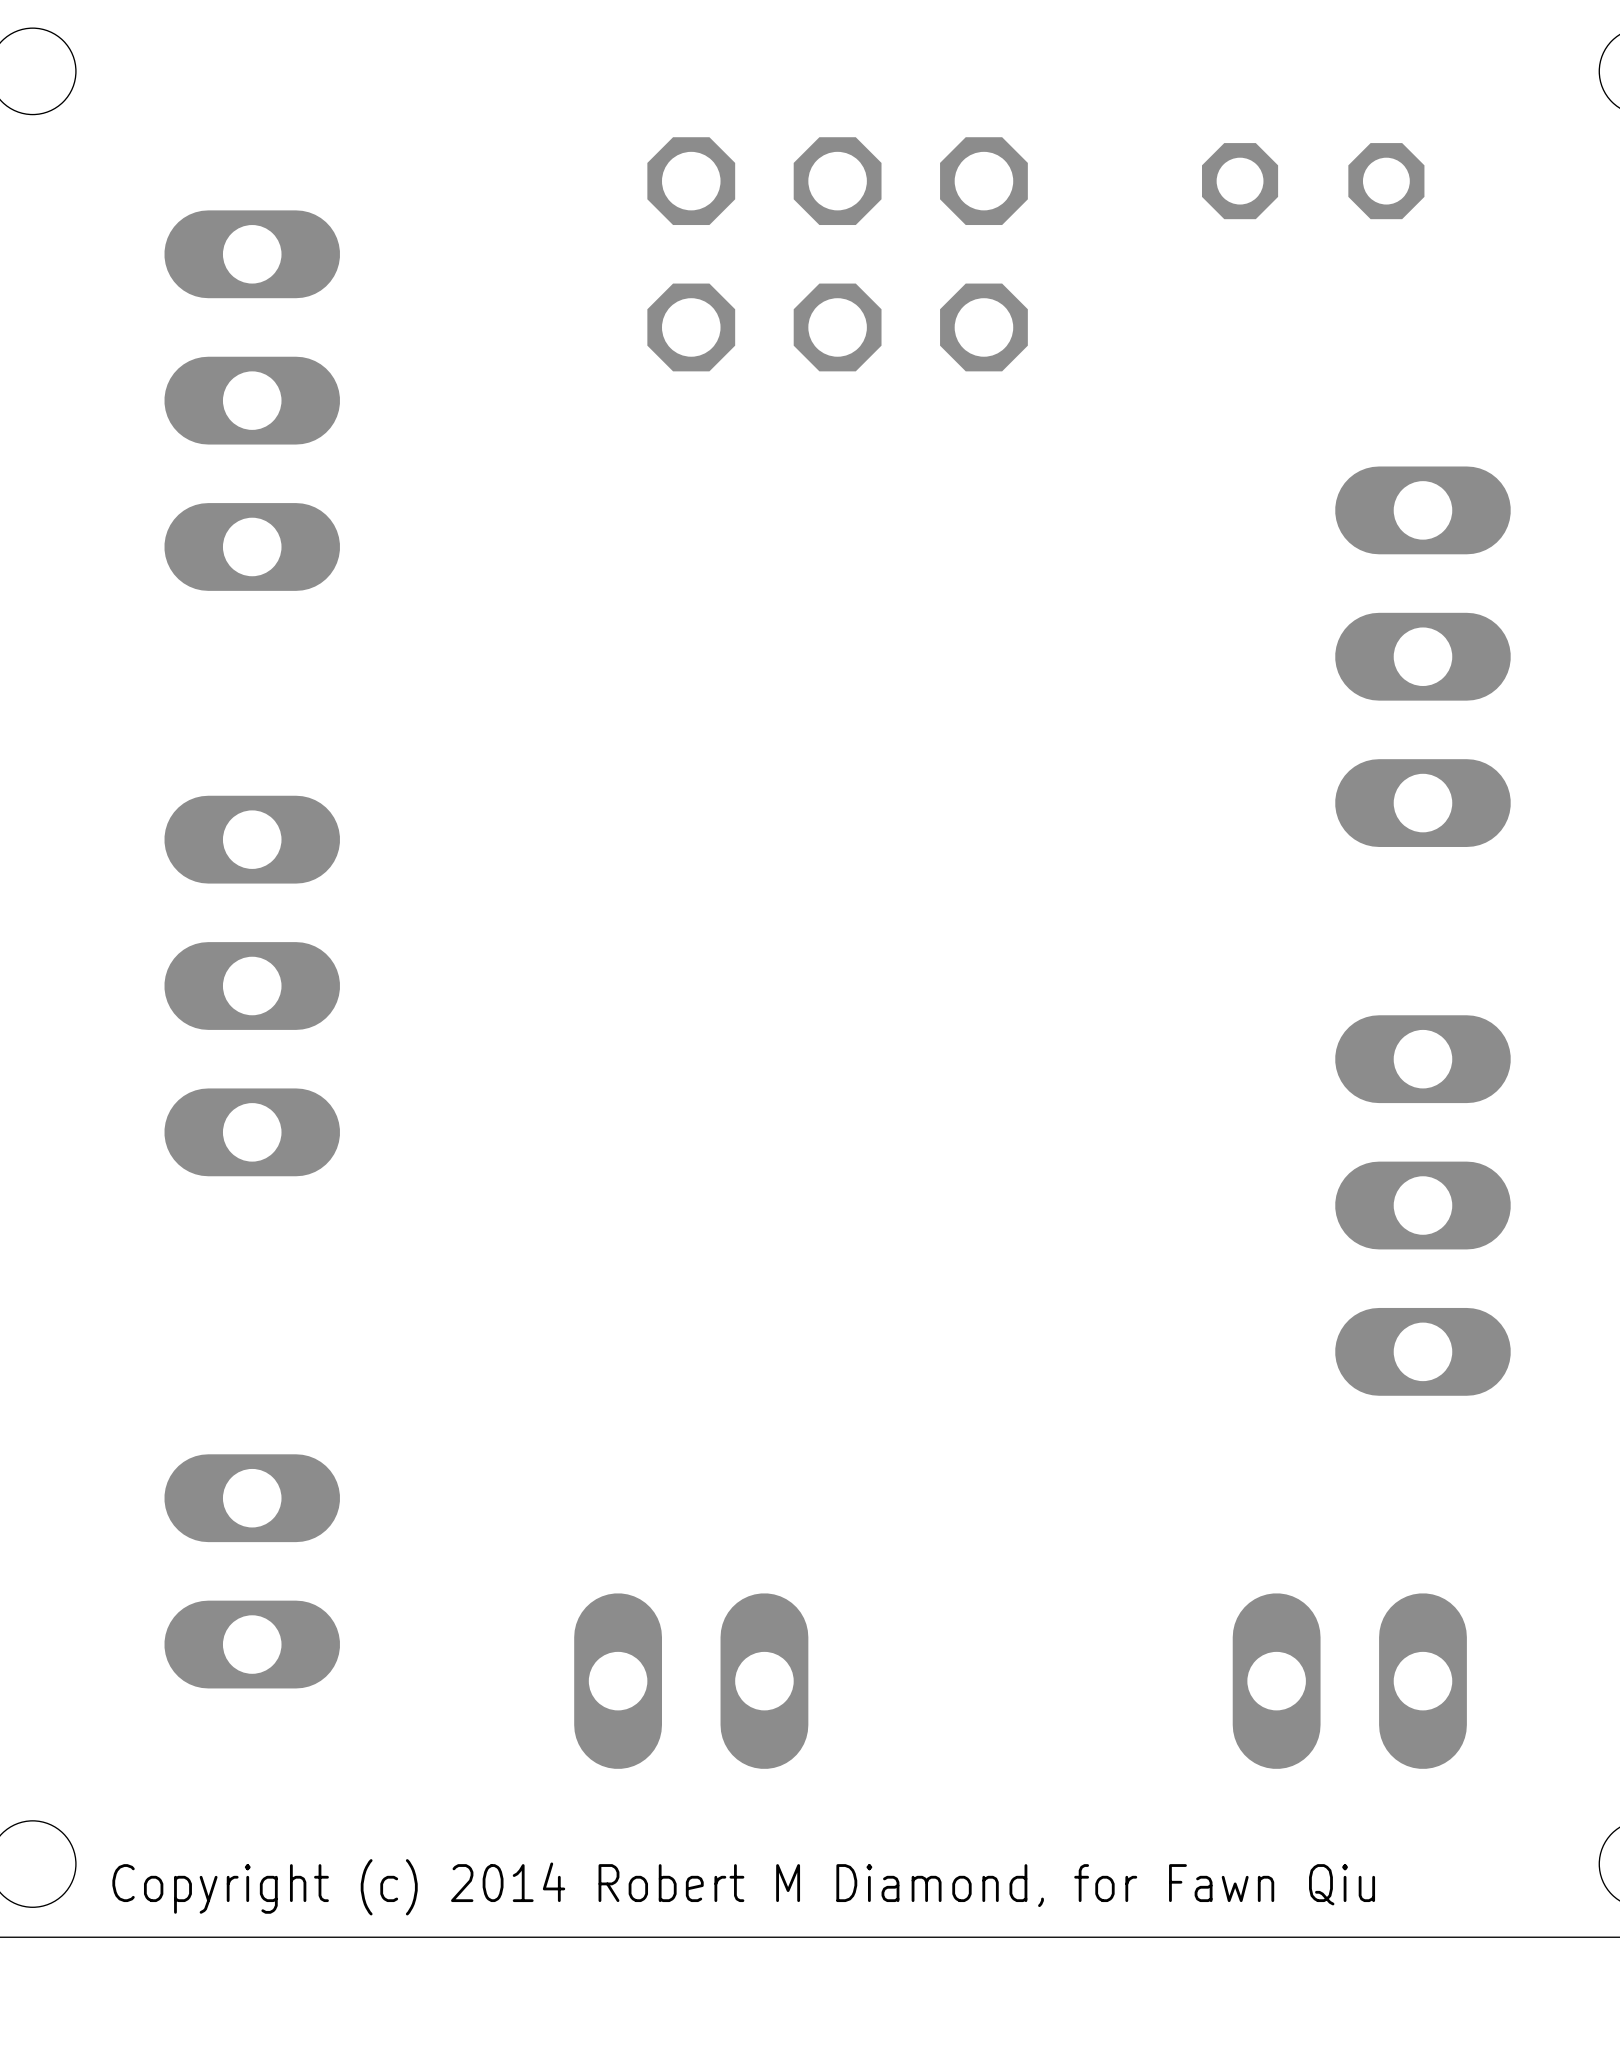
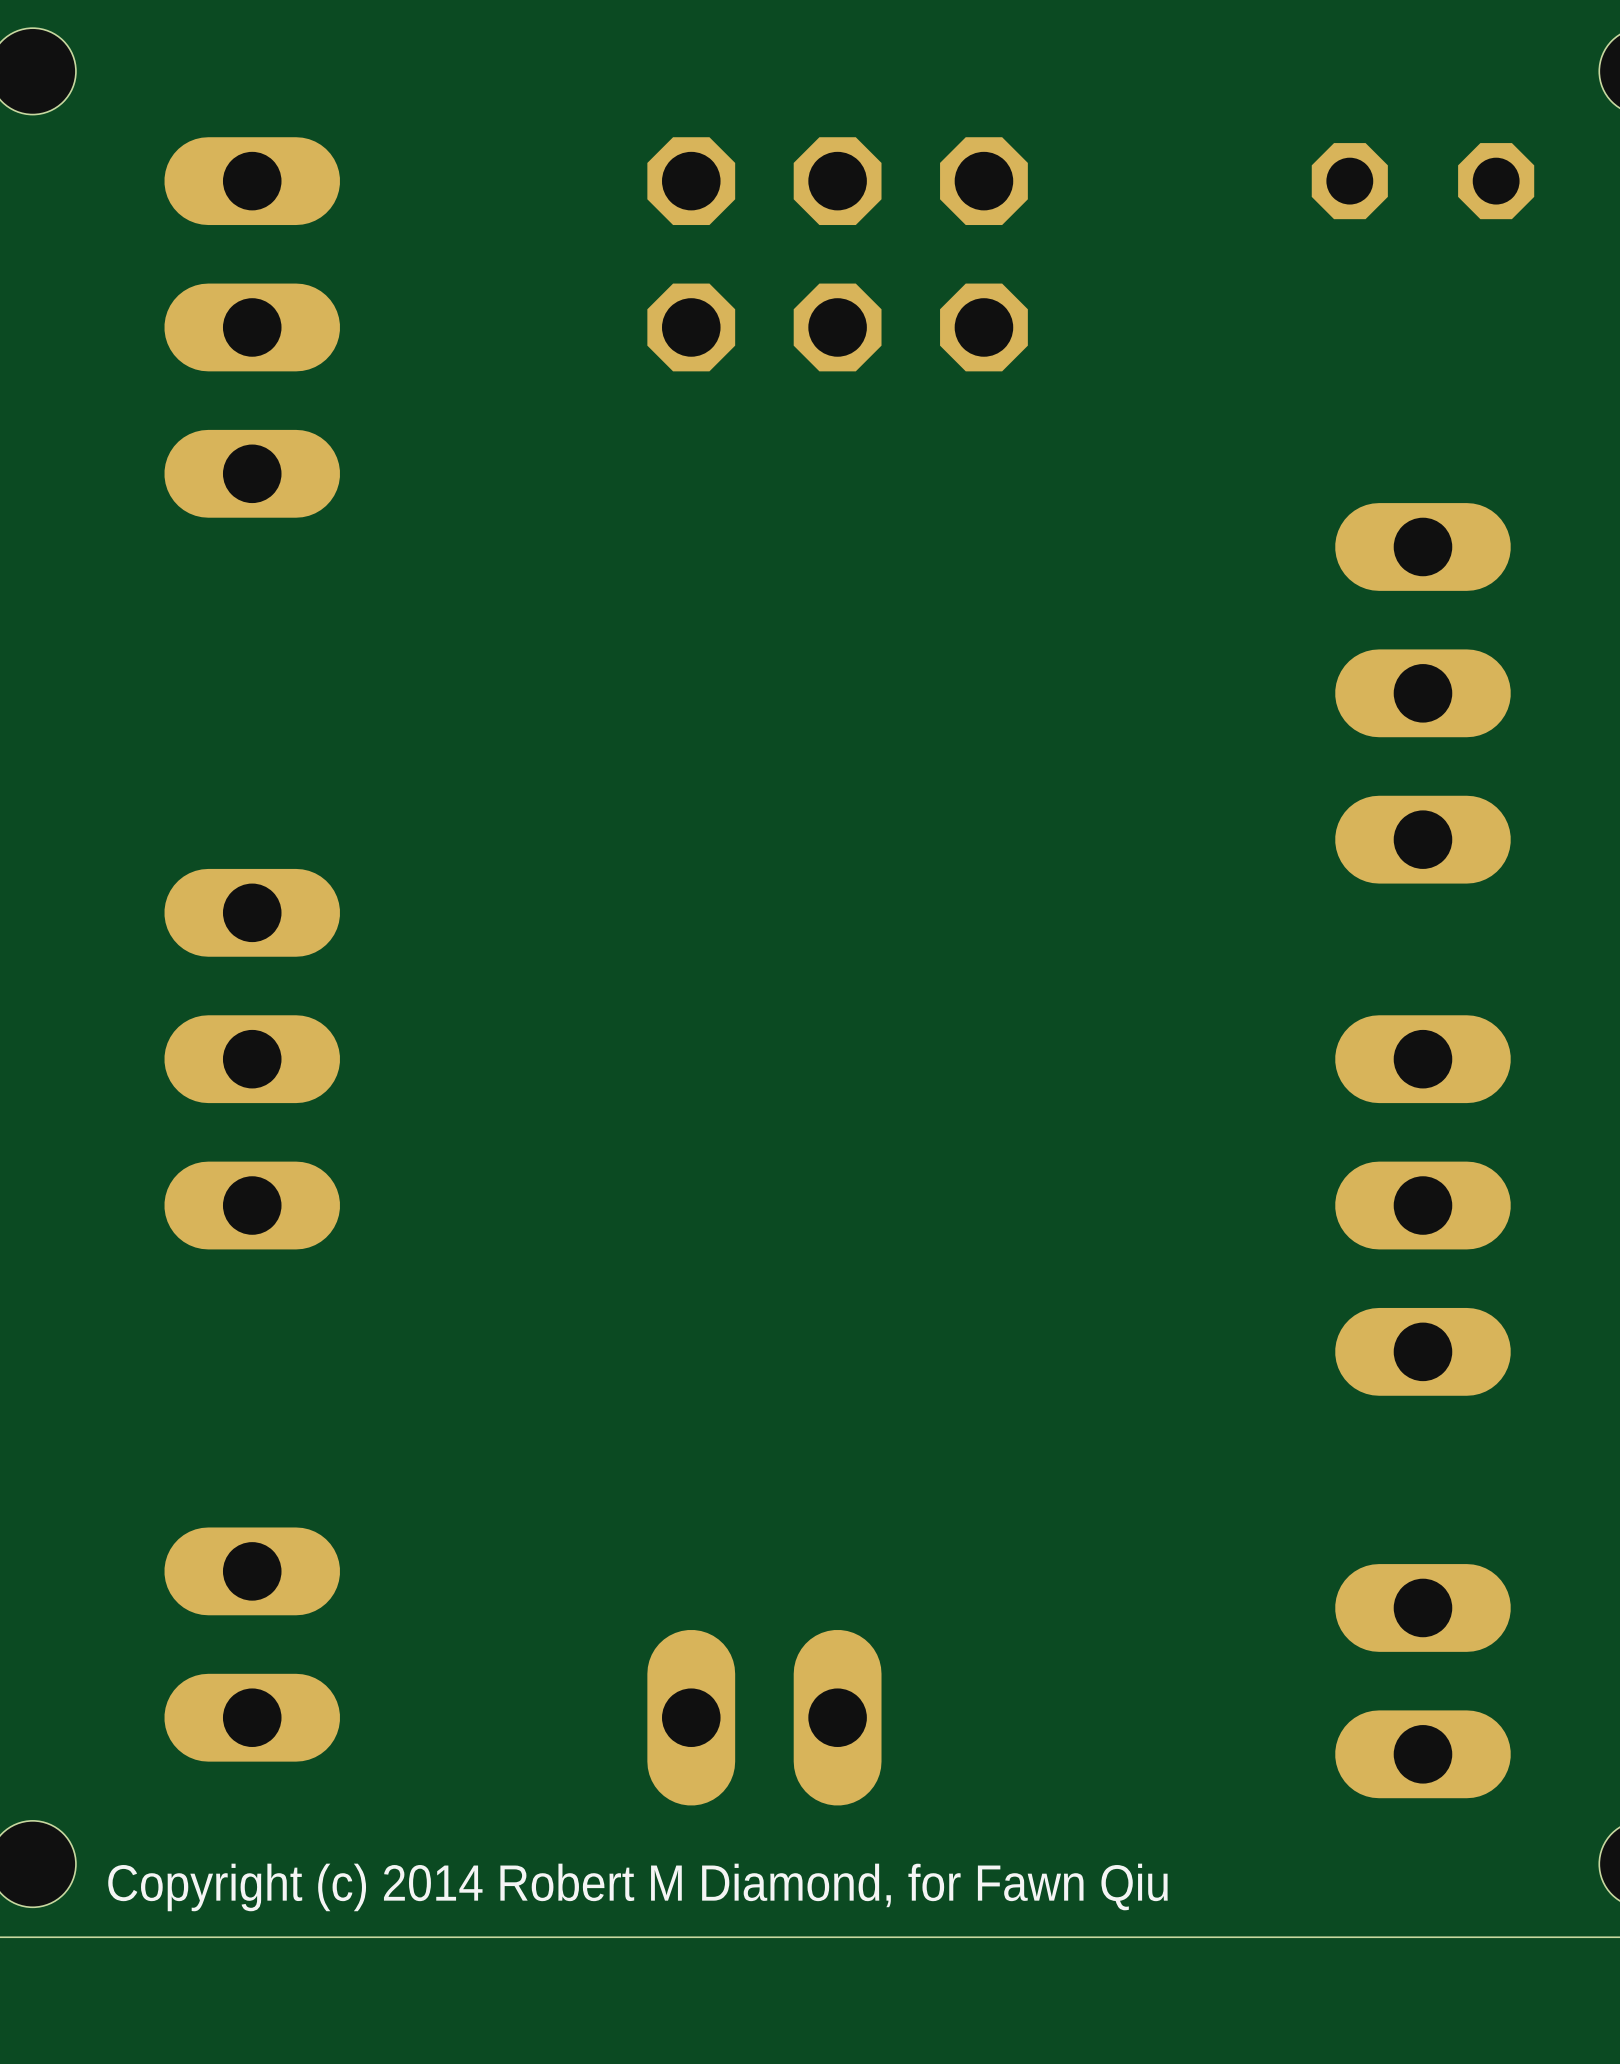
part position: (1313, 181) -> (1422, 181)
part position: (252, 400) -> (252, 327)
part position: (1422, 656) -> (1422, 693)
part position: (252, 986) -> (252, 1059)
part position: (252, 1571) -> (252, 1644)
part position: (691, 1681) -> (764, 1717)
part rotation: 0° (1349, 1681) -> 90° clockwise (1422, 1681)

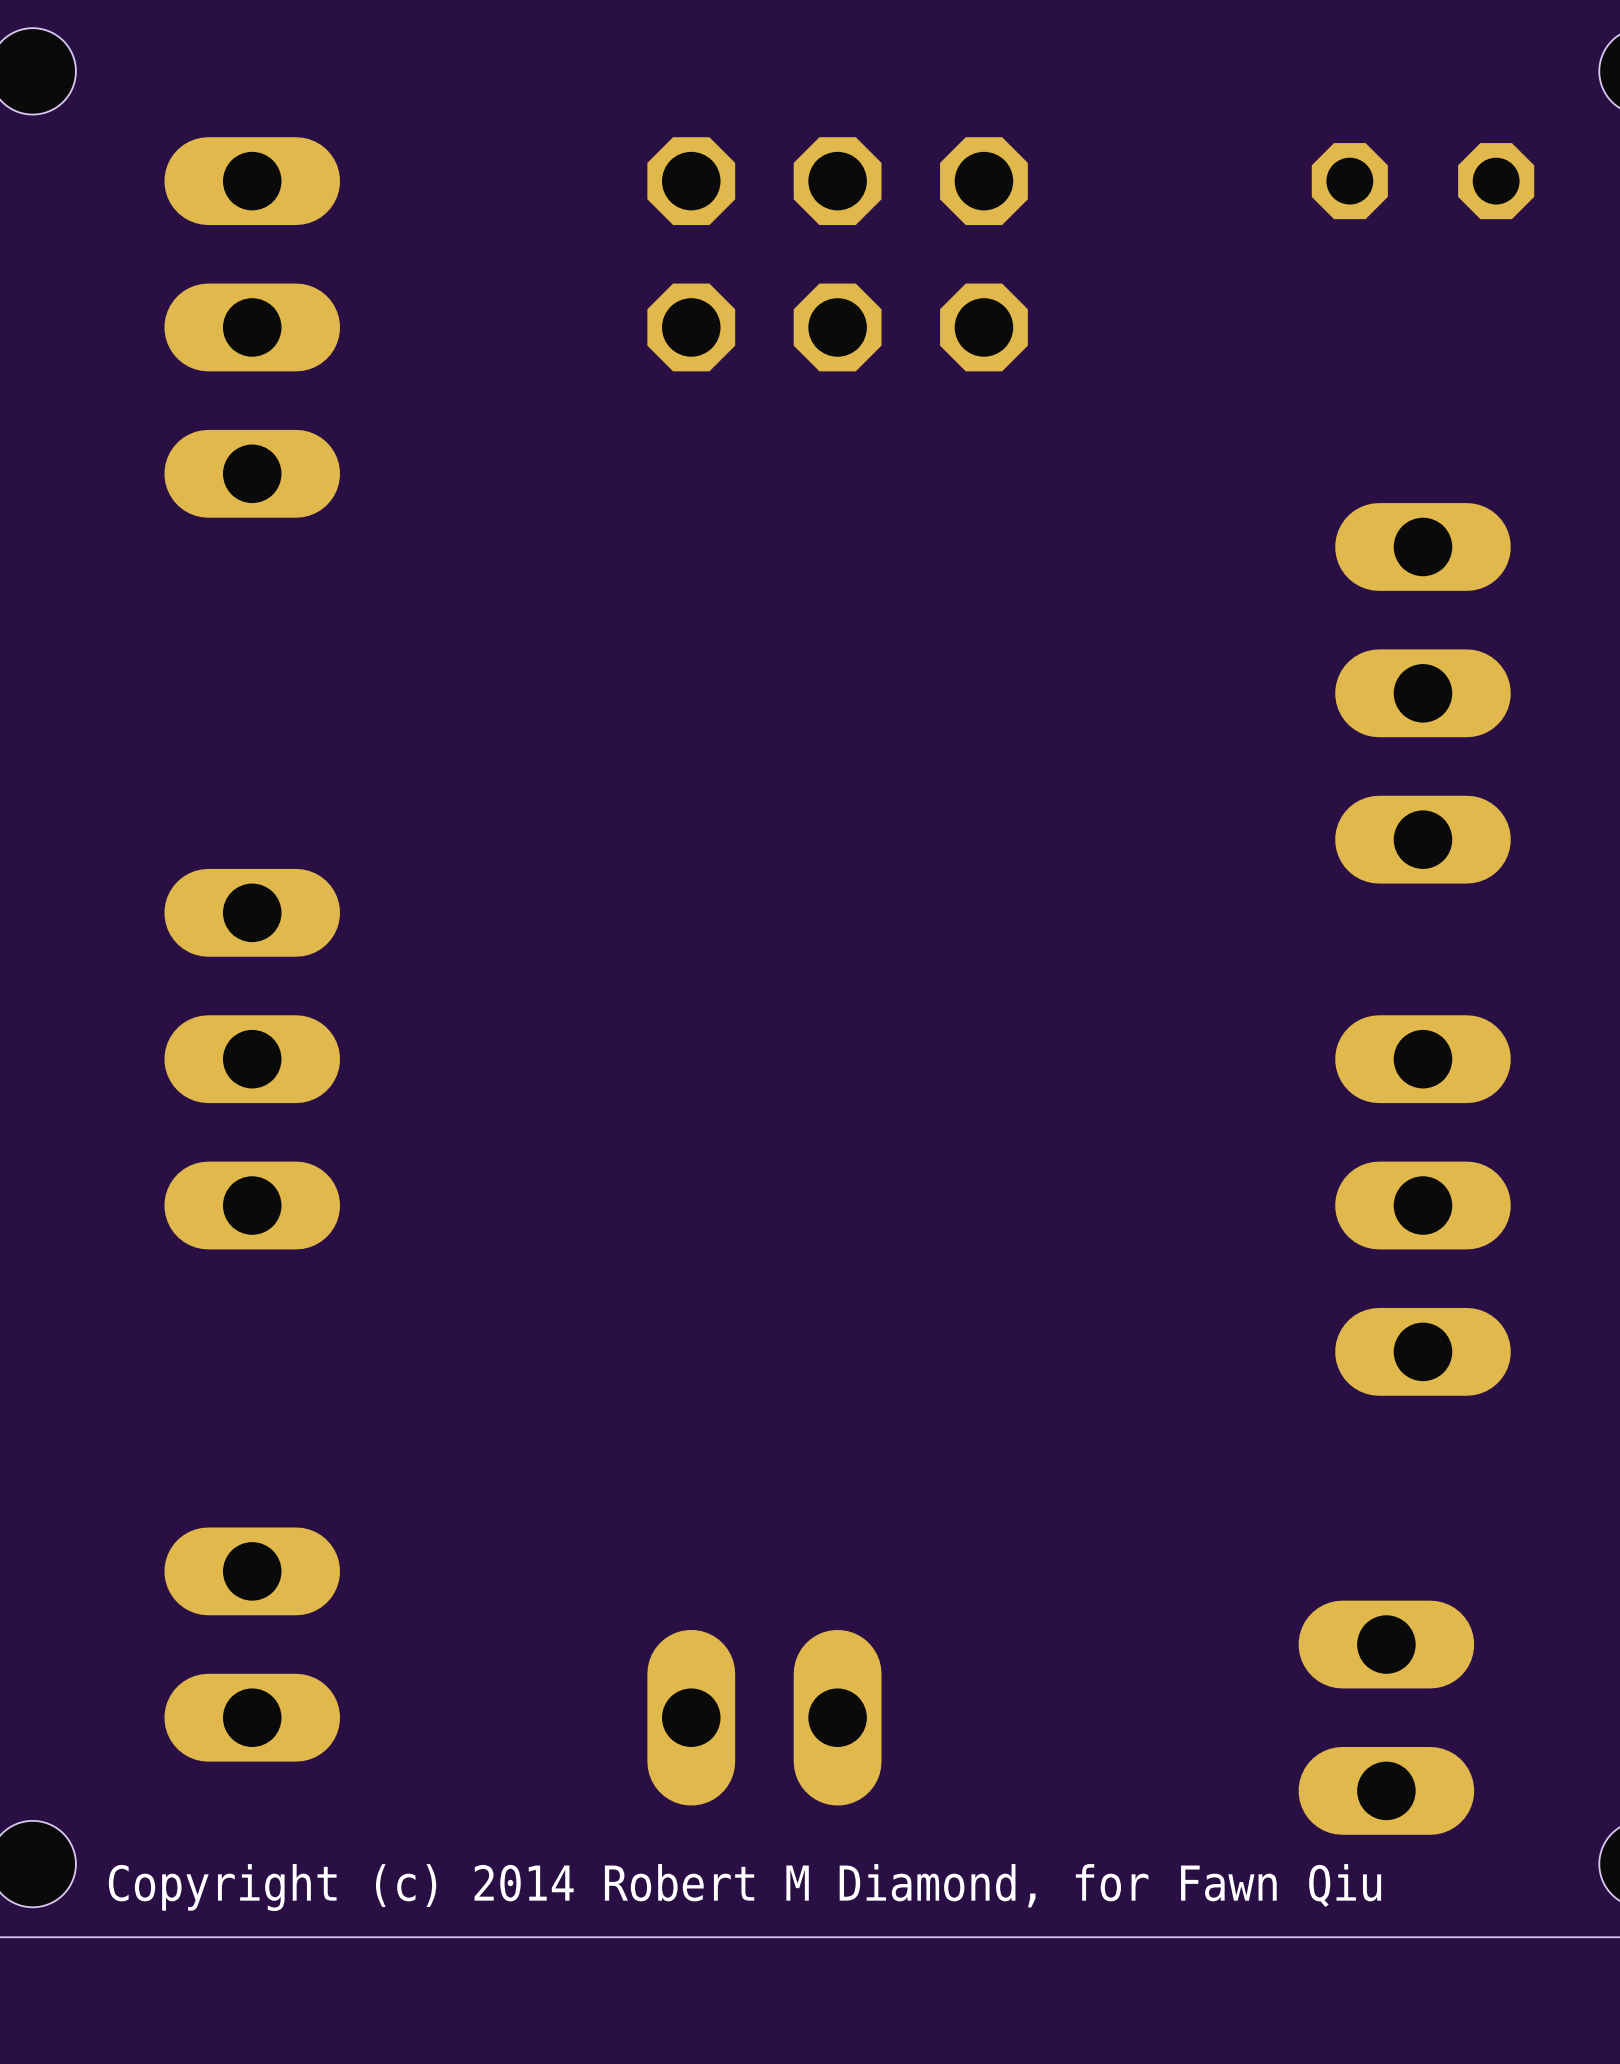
part position: (1422, 1681) -> (1386, 1717)

